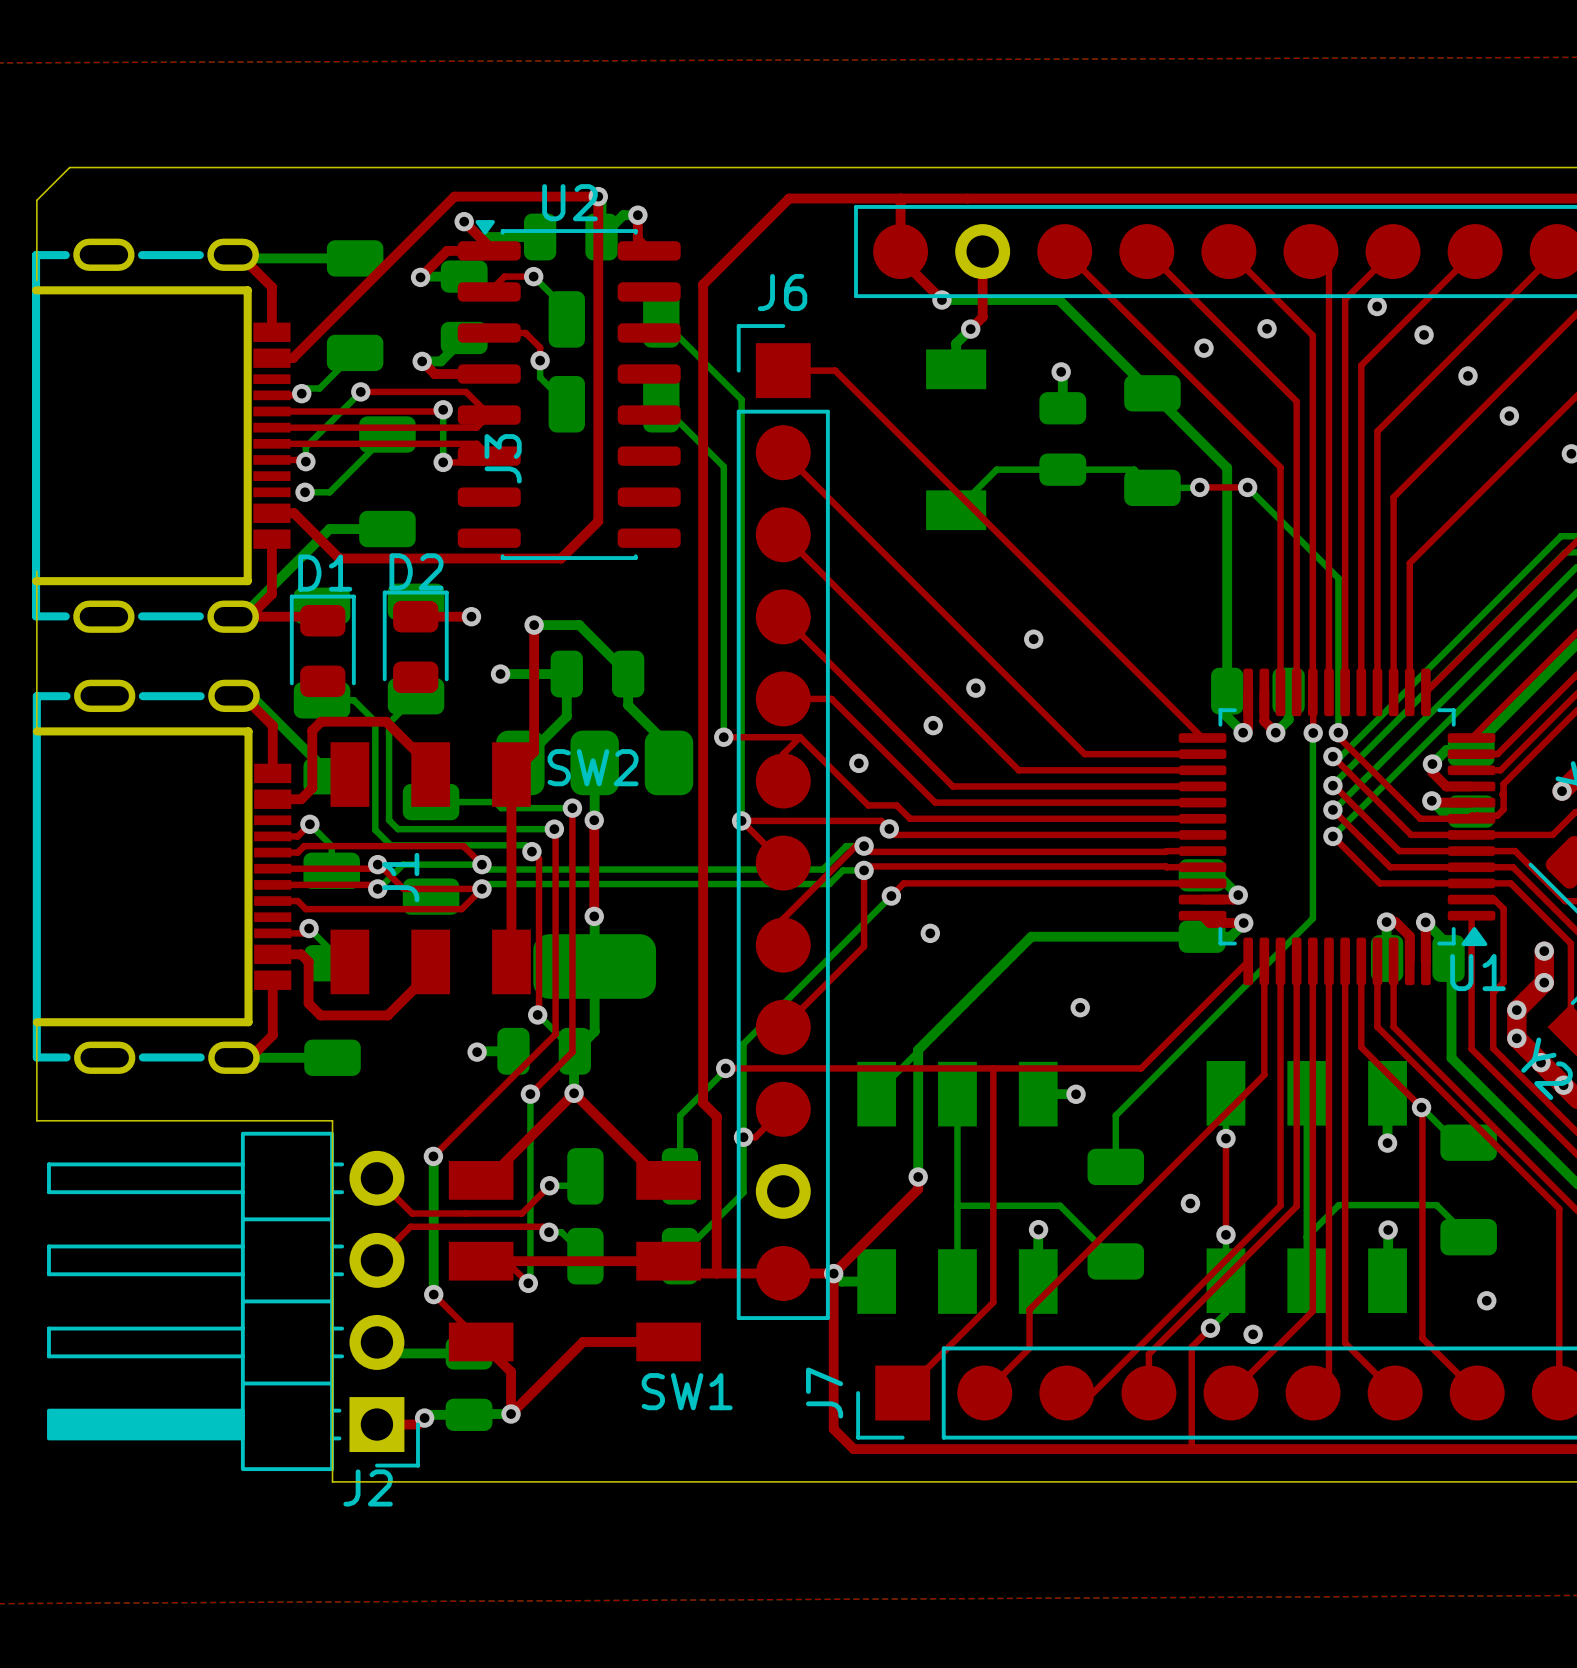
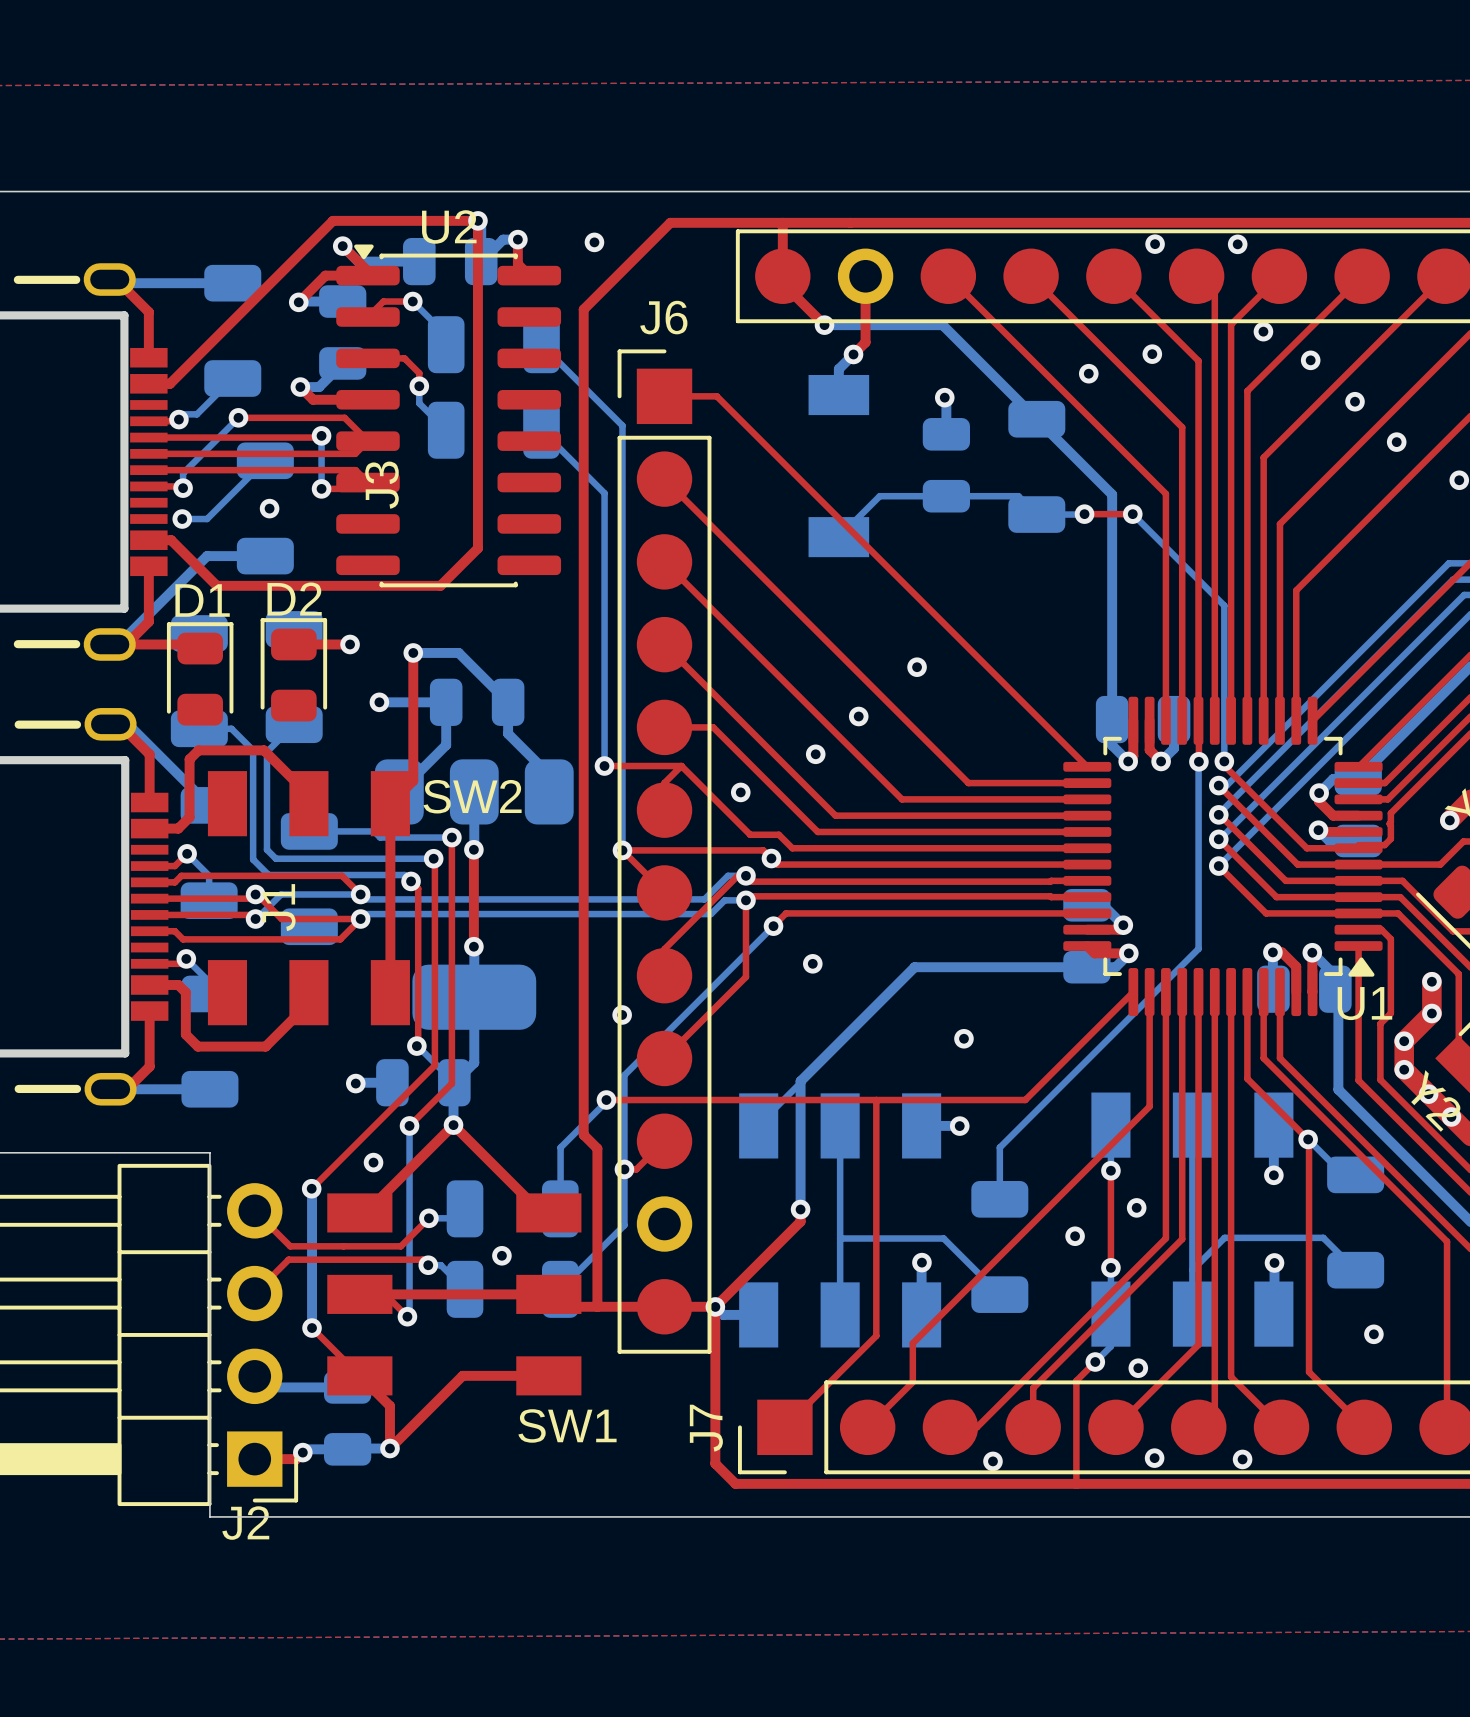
via: none -> (594, 242)
via: none -> (1155, 244)
via: none -> (1237, 244)
via: none -> (269, 508)
via: none -> (622, 1014)
via: none -> (373, 1162)
via: none -> (1136, 1207)
via: none -> (501, 1255)
via: none -> (1154, 1458)
via: none -> (1242, 1459)
via: none -> (992, 1461)

